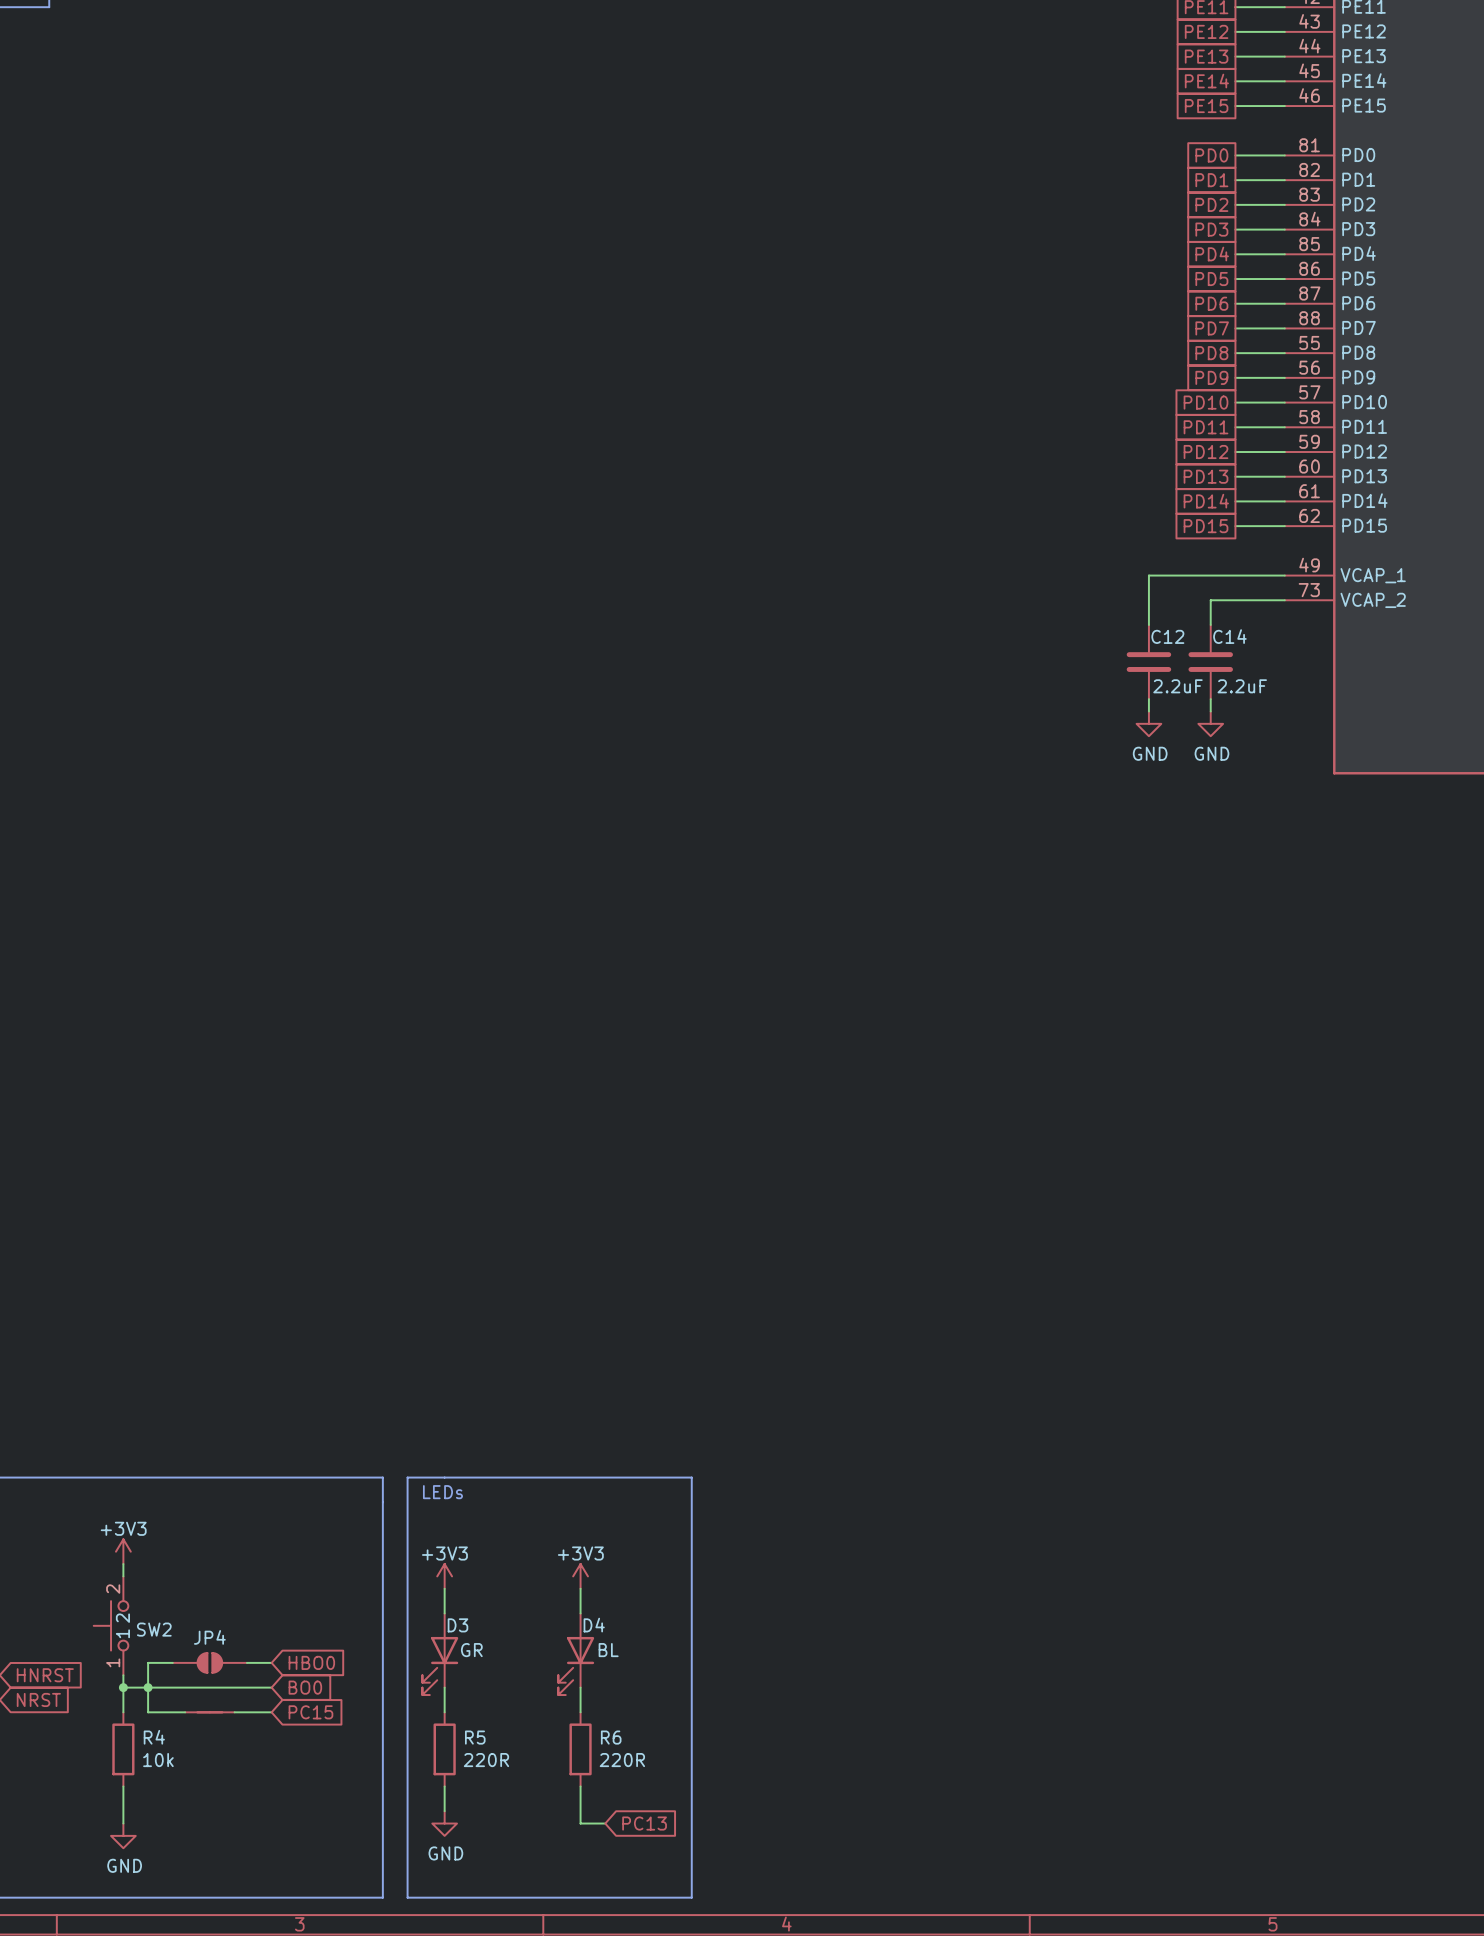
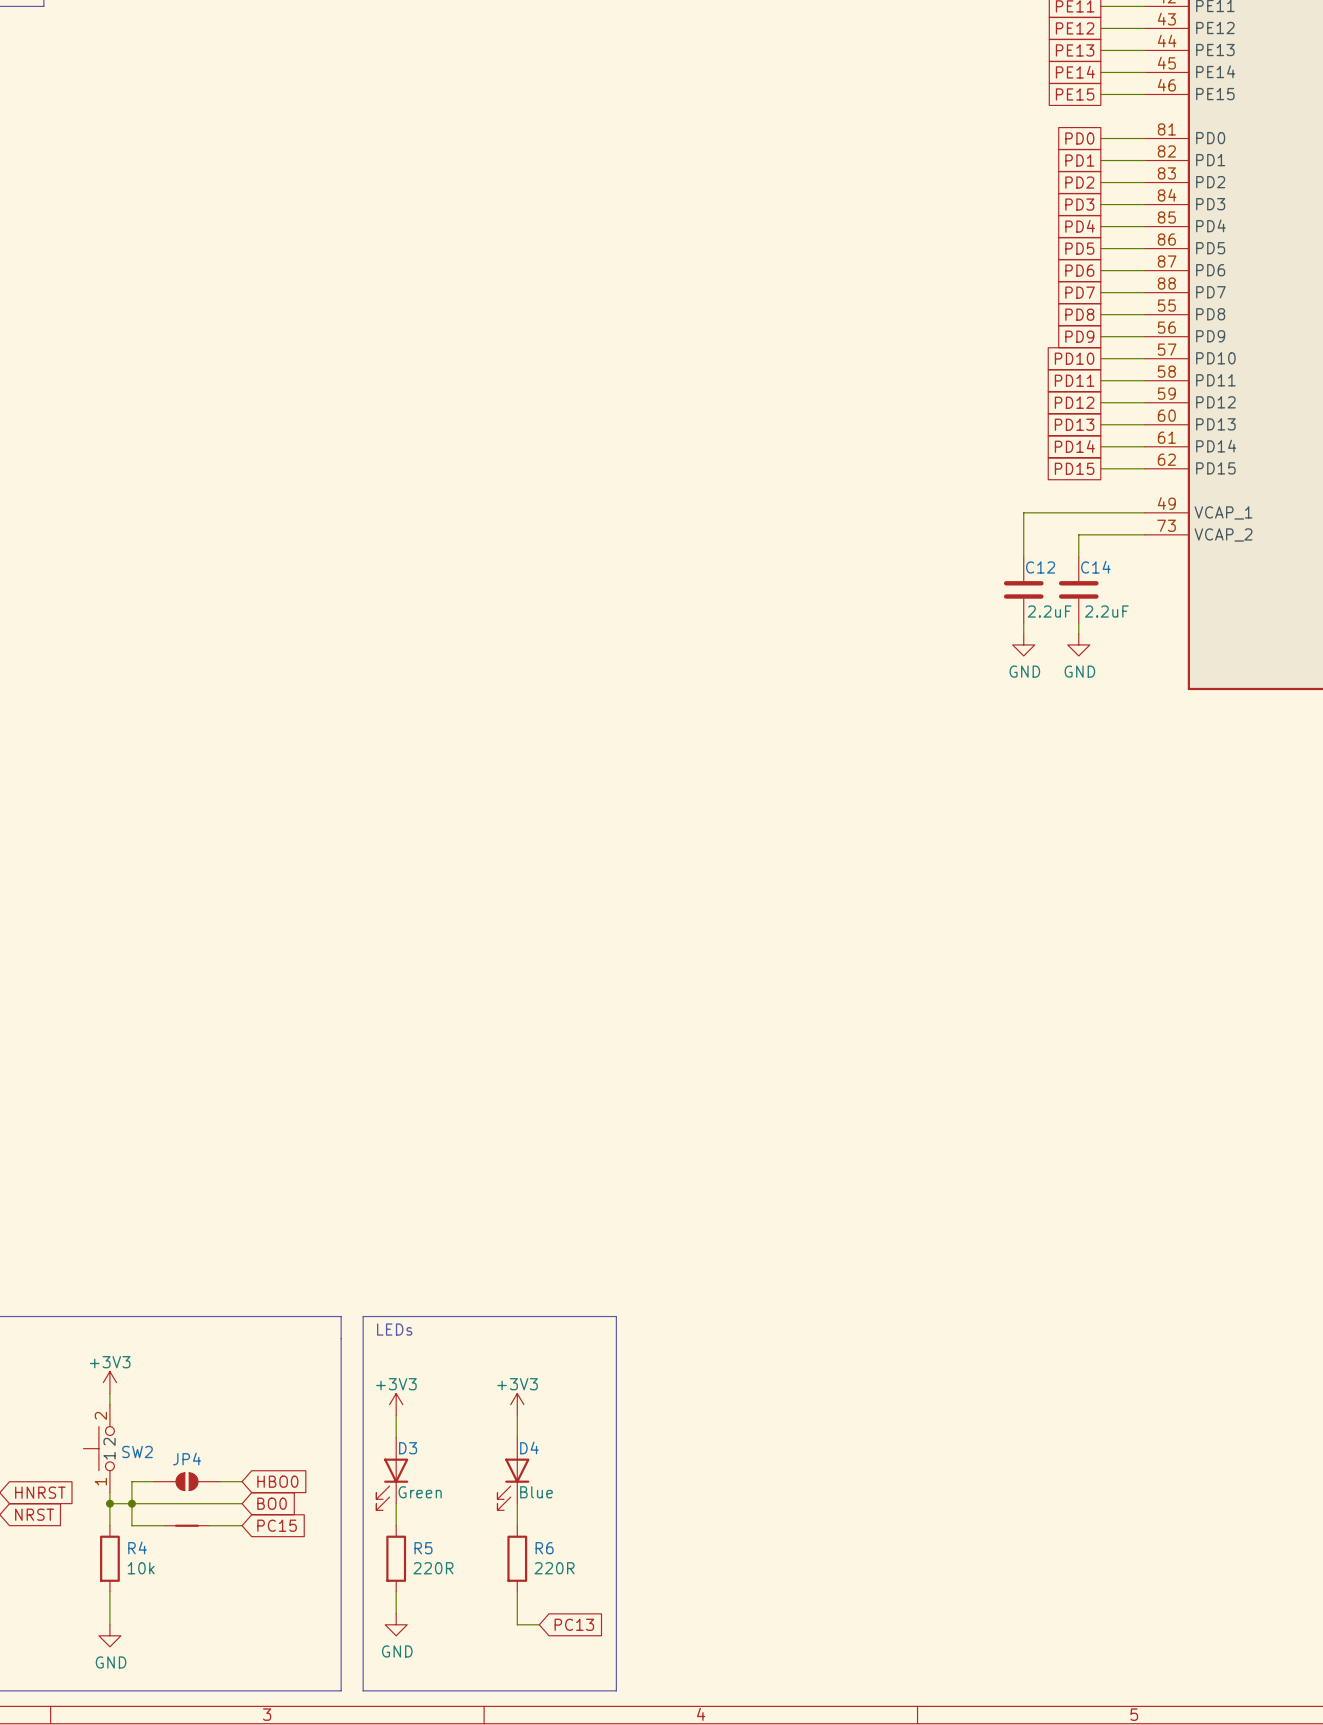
D3 value: GR (471, 1650) -> none
D4 value: BL (608, 1650) -> none
D3 text: none -> Green (420, 1492)
D4 text: none -> Blue (536, 1492)

